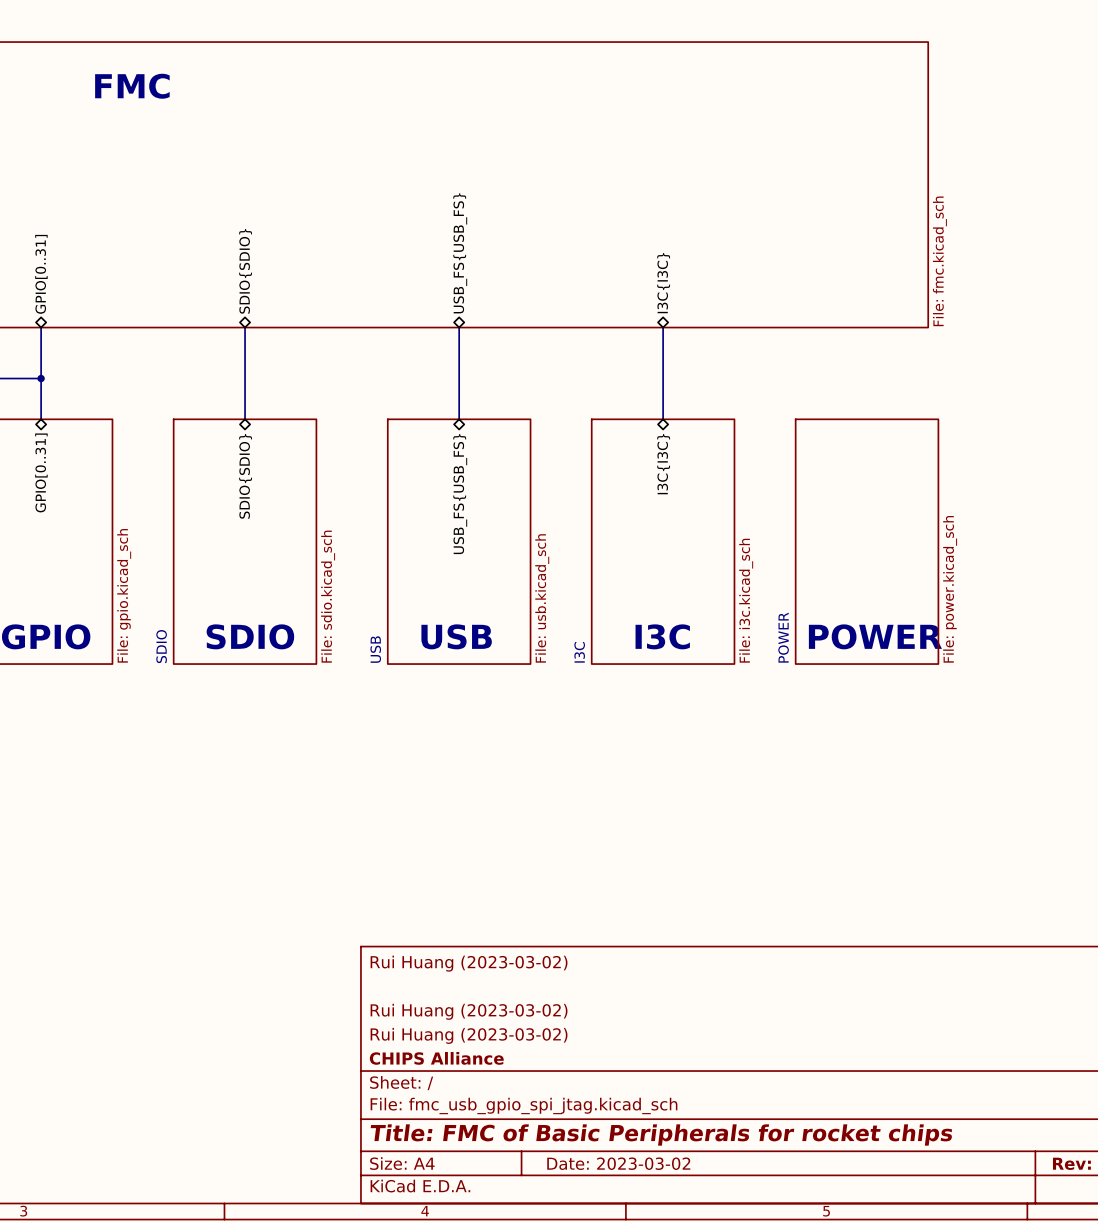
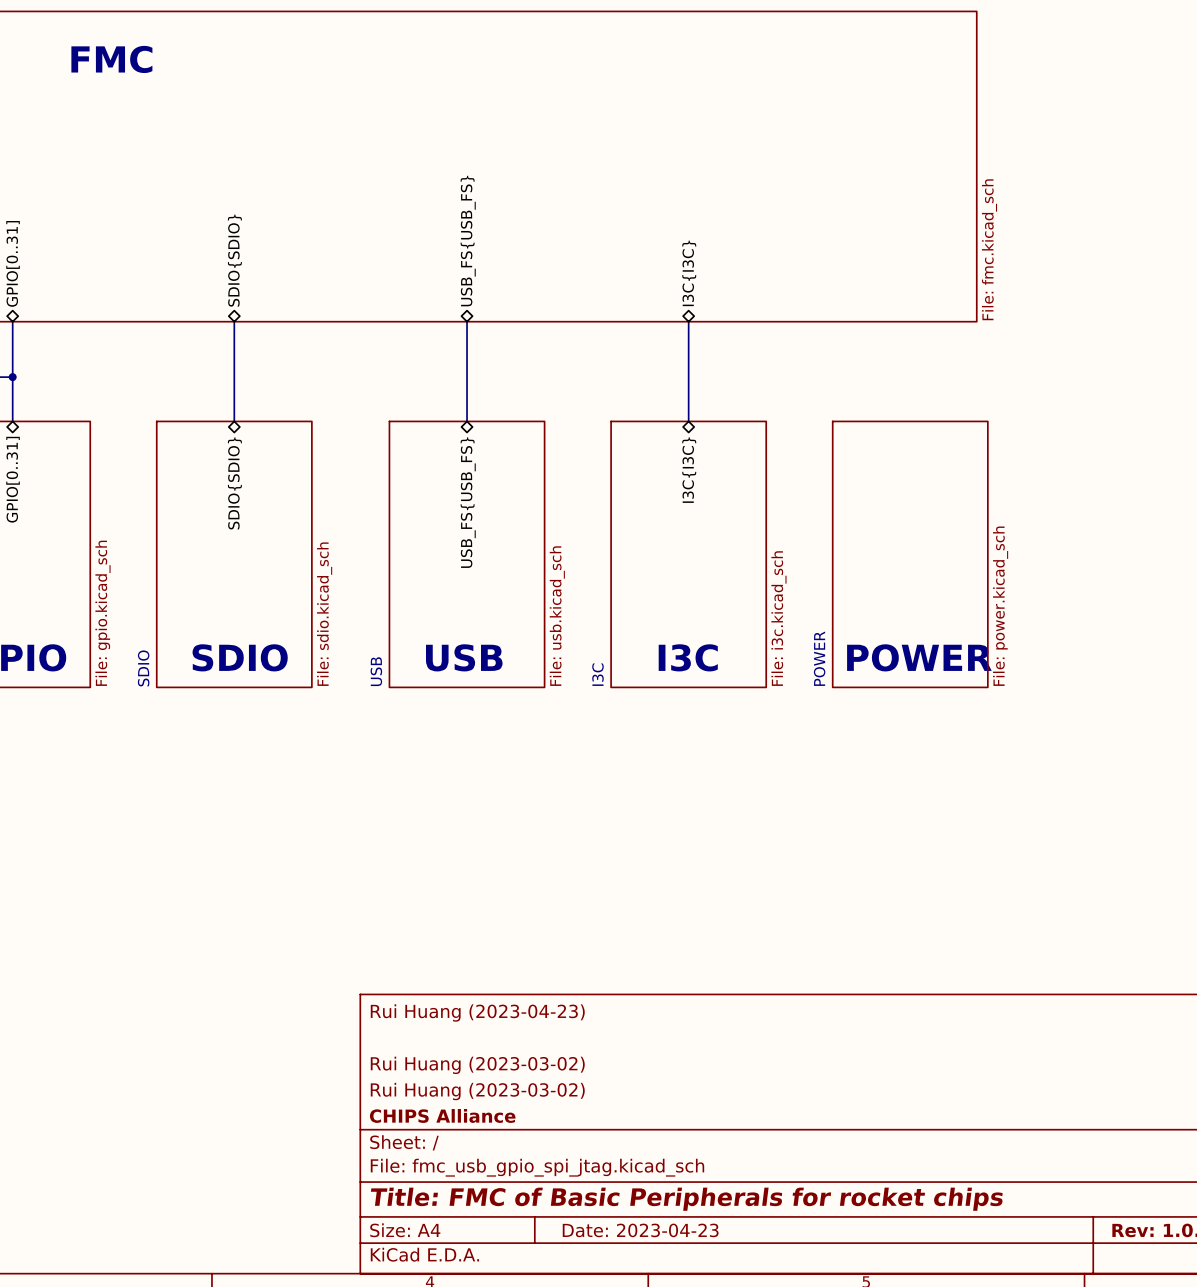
title block: Rui Huang (2023-03-02) (469, 963) -> Rui Huang (2023-04-23) (477, 1012)
title block: Date: 2023-03-02 (618, 1163) -> Date: 2023-04-23 (640, 1230)

